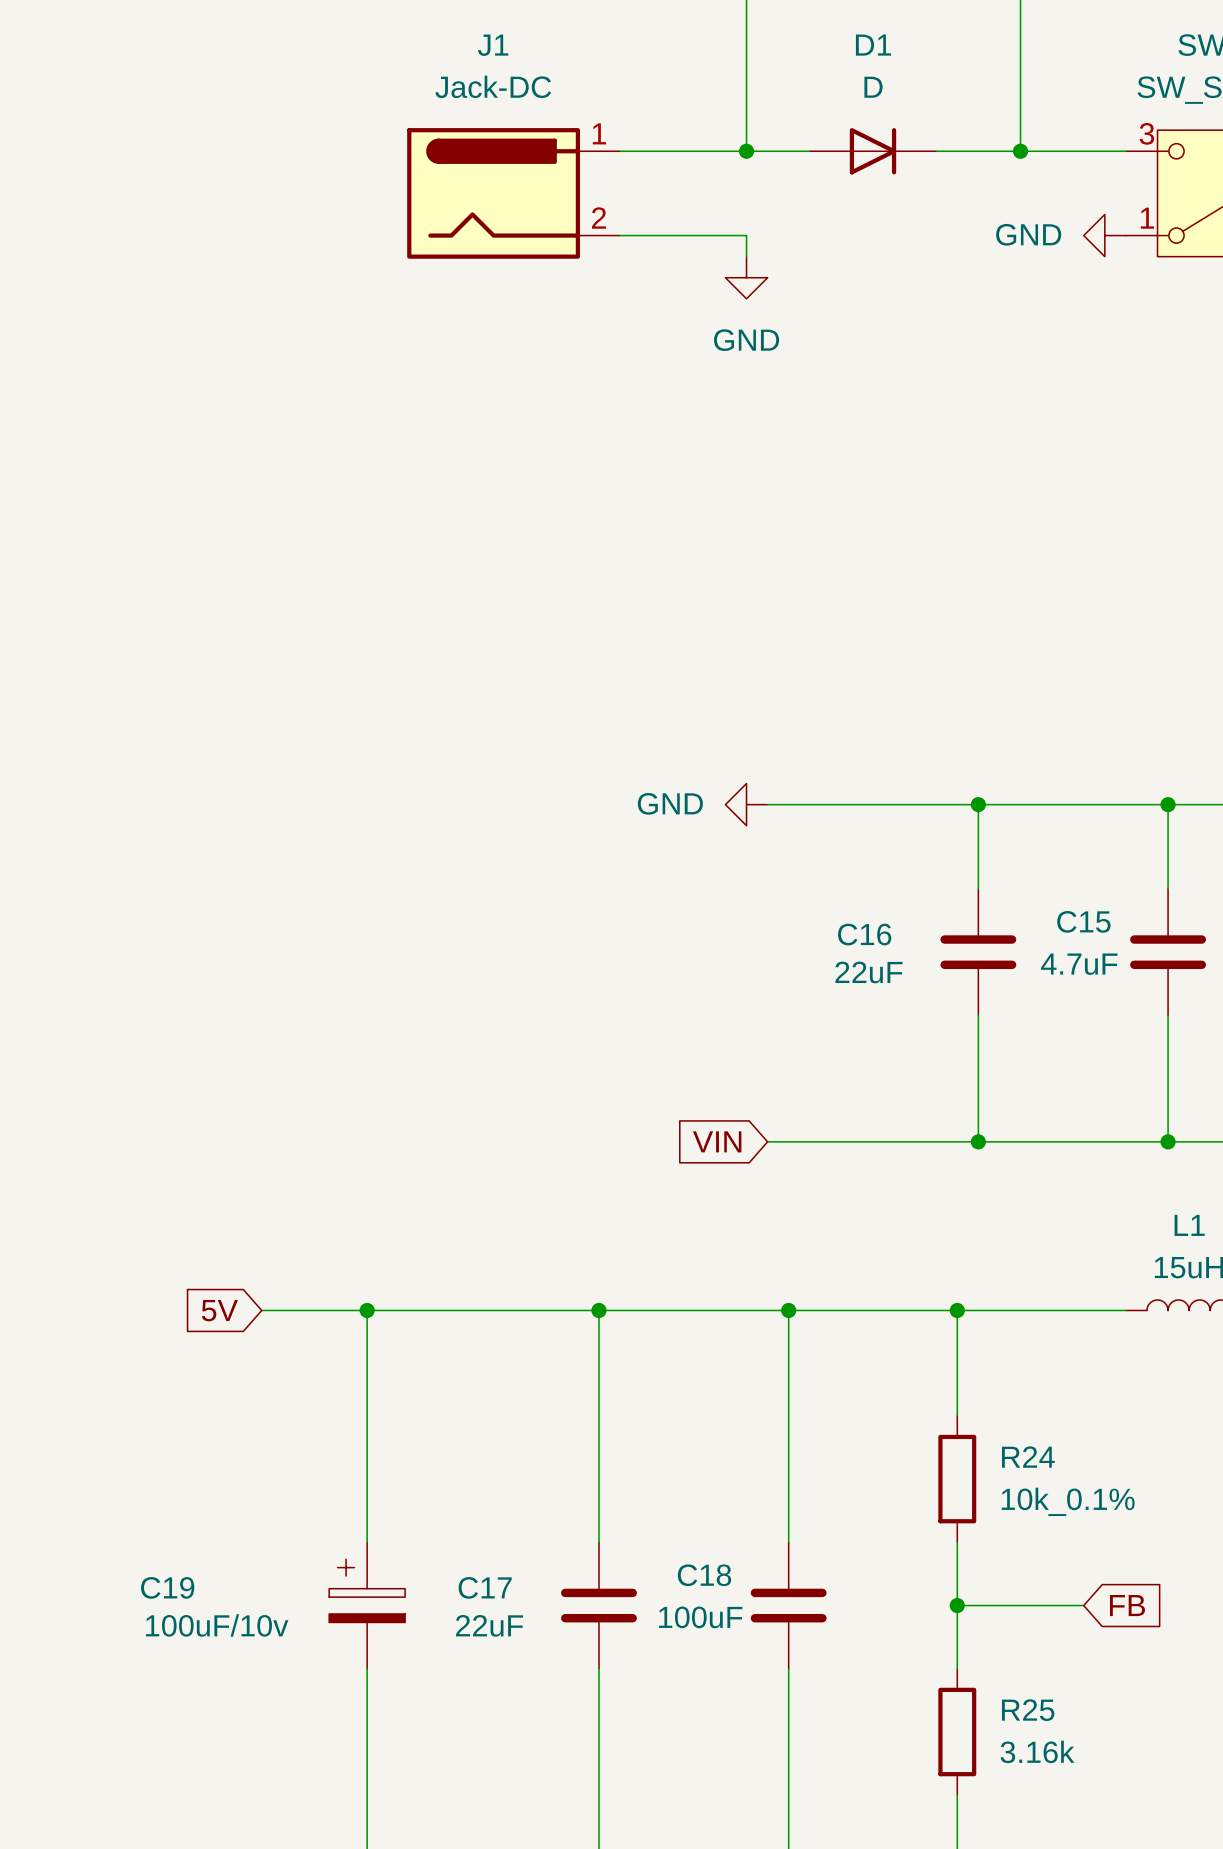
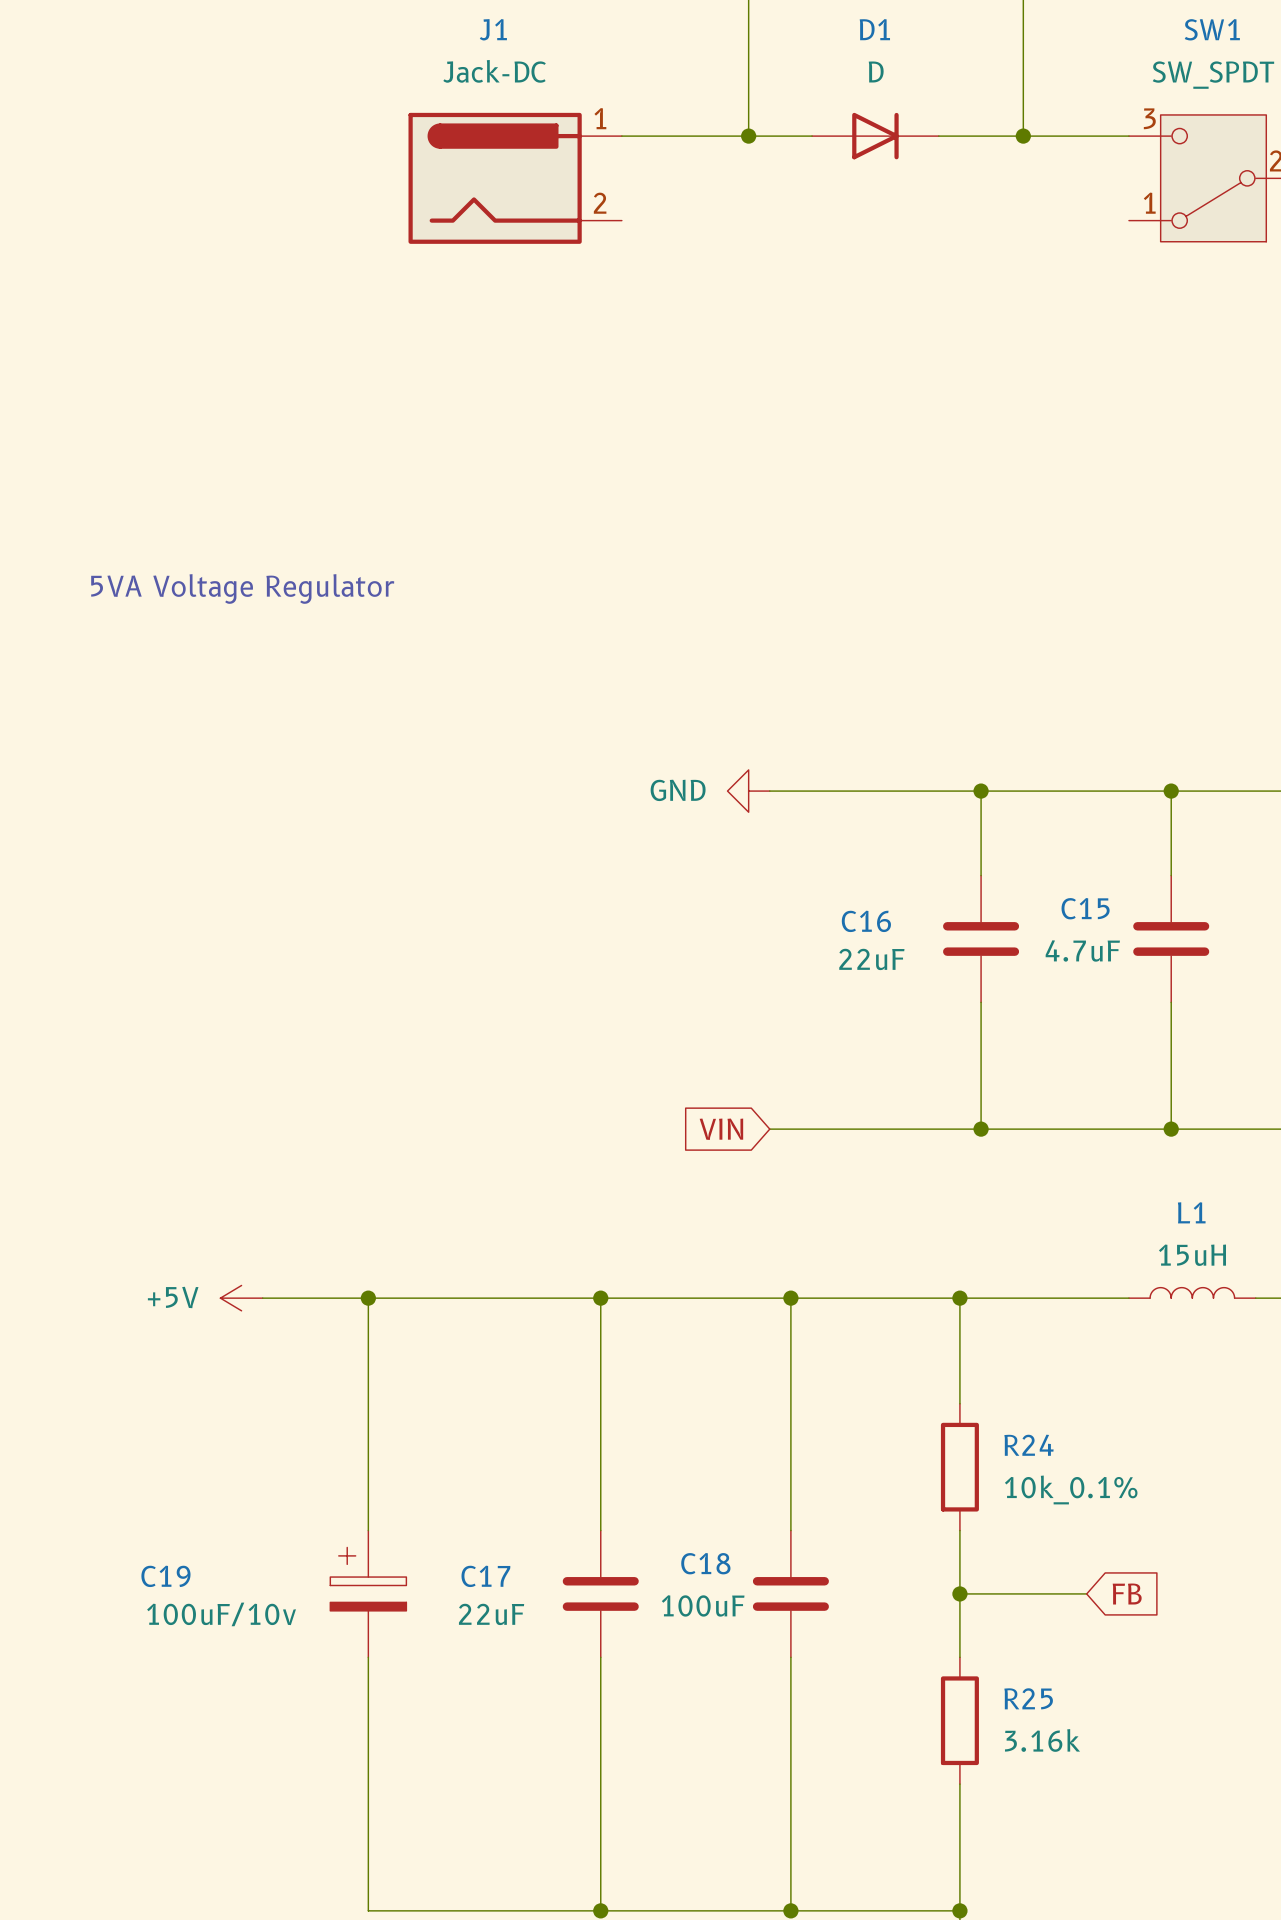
wire: (620, 235) (746, 235) (746, 256) -> none
power symbol: GND (1104, 235) -> none
power symbol: GND (746, 277) -> none
text: none -> 5VA Voltage Regulator (242, 588)
global label: 5V (219, 1310) -> none
power symbol: none -> +5V (241, 1298)

